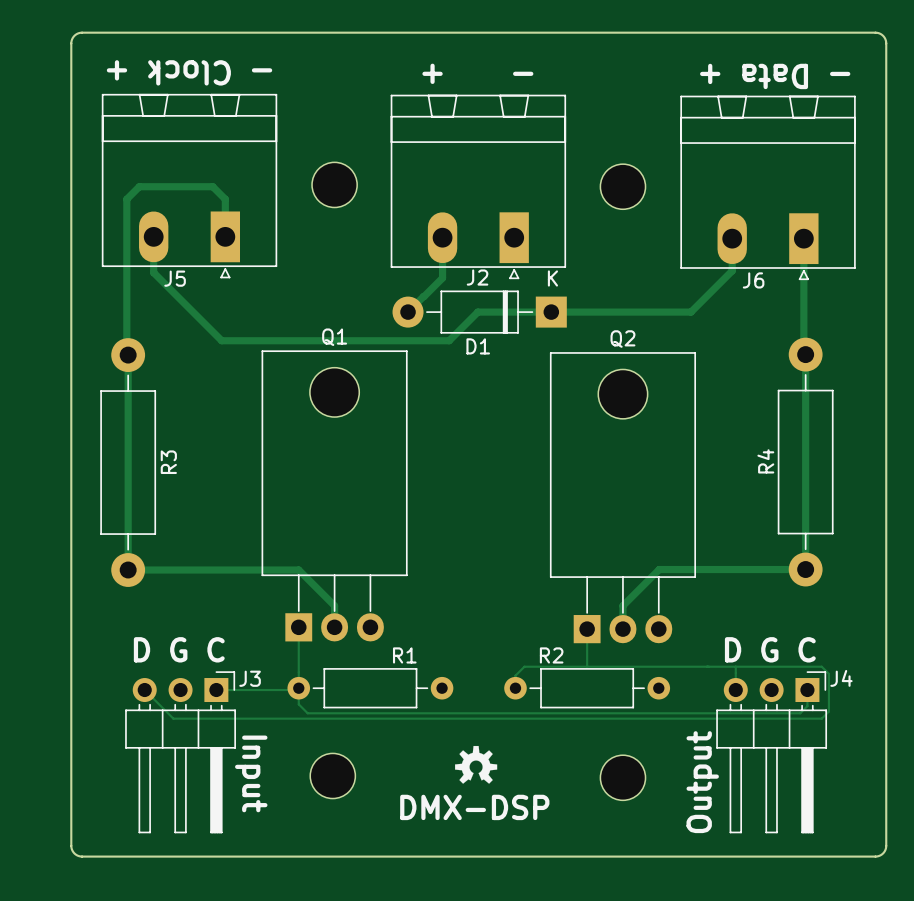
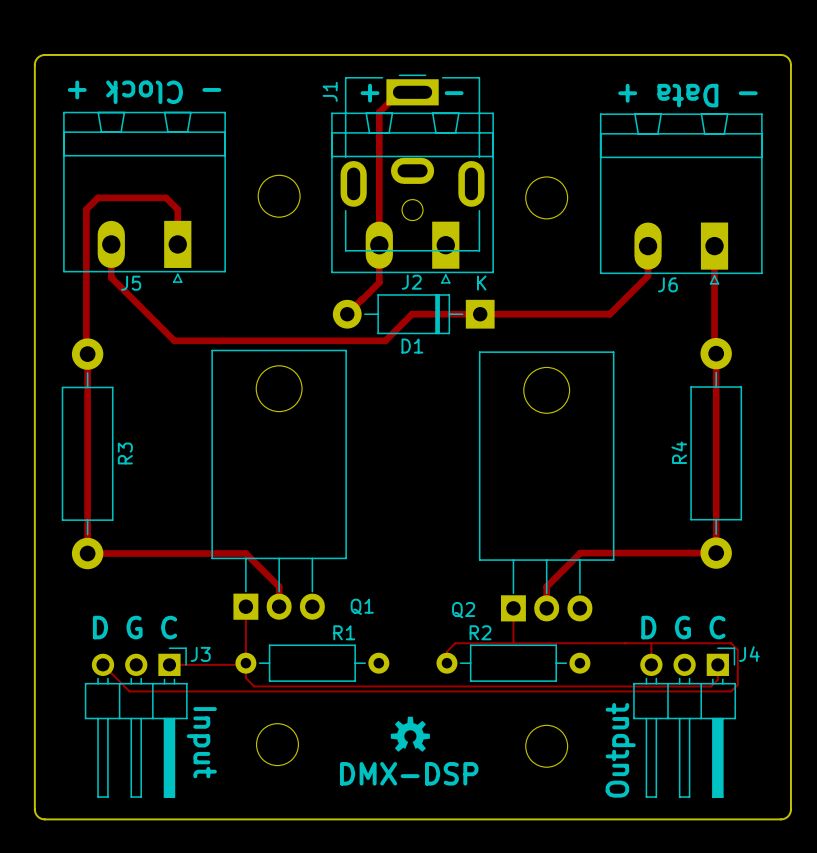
track: none -> (412, 92) (399, 92) (379, 112) (379, 245)
J1: none -> (412, 163)
Q1 name position: Q1 (334, 337) -> Q1 (362, 606)
Q2 name position: Q2 (622, 339) -> Q2 (463, 610)

